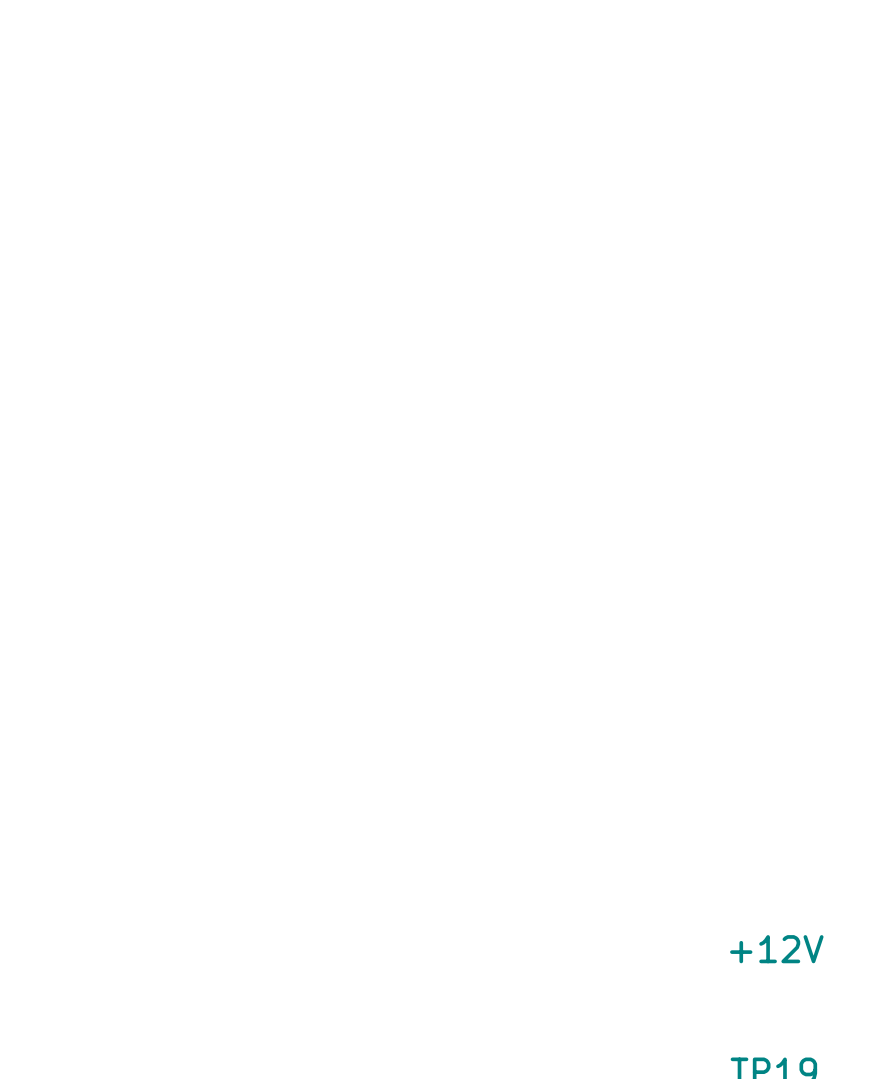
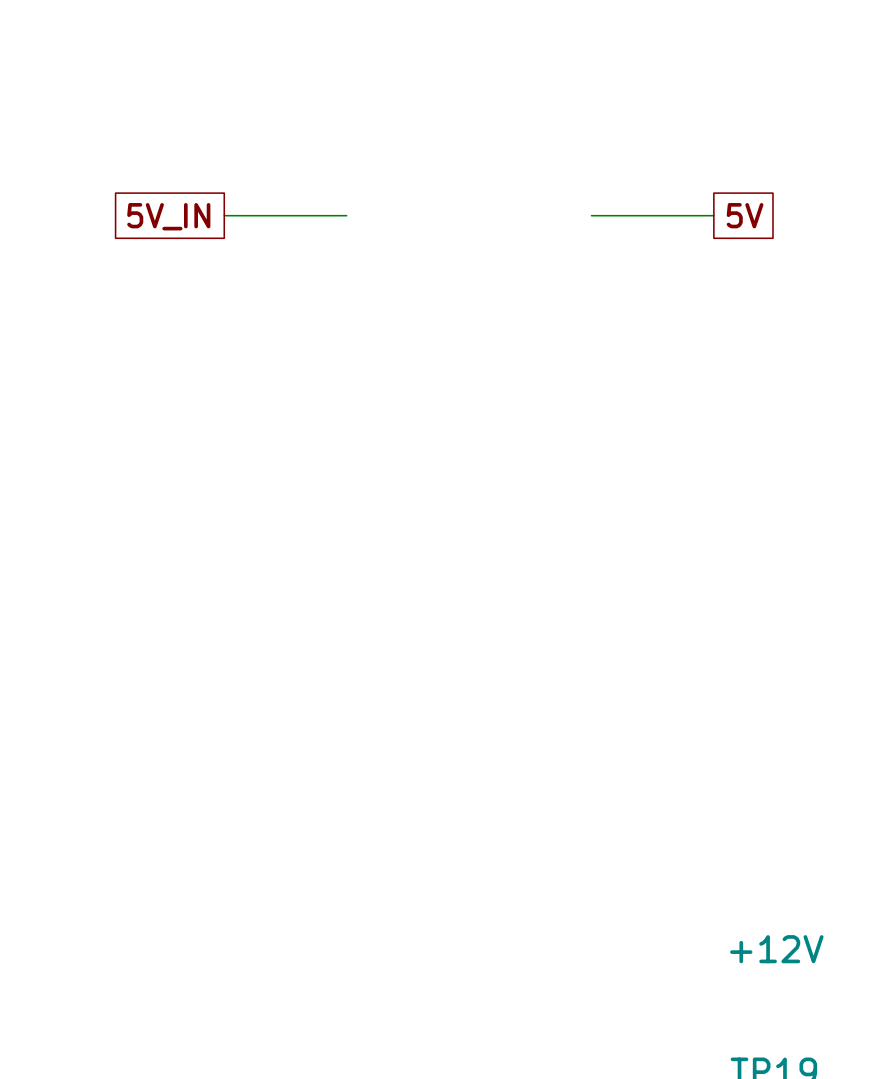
wire: none -> (224, 215) (346, 215)
wire: none -> (591, 215) (713, 215)
global label: none -> 5V (745, 215)
global label: none -> 5V_IN (168, 216)

